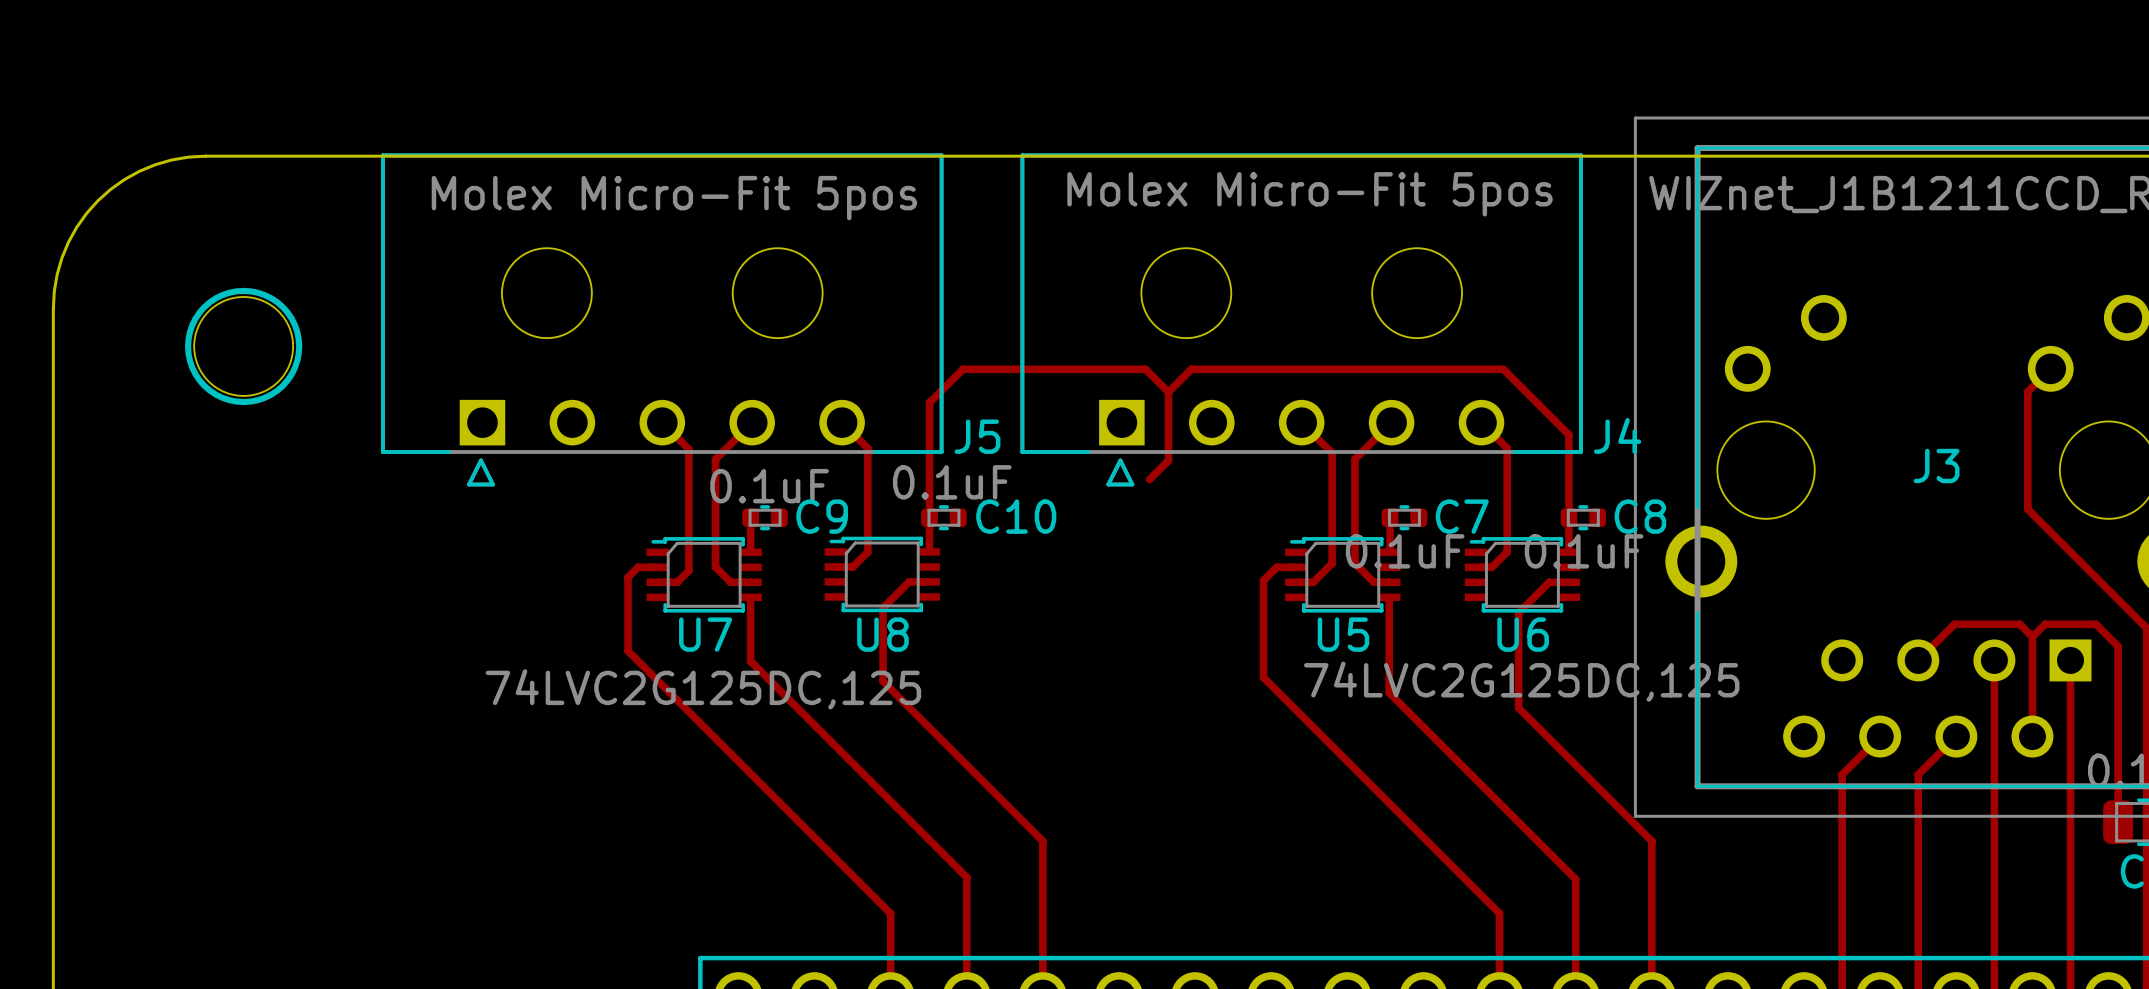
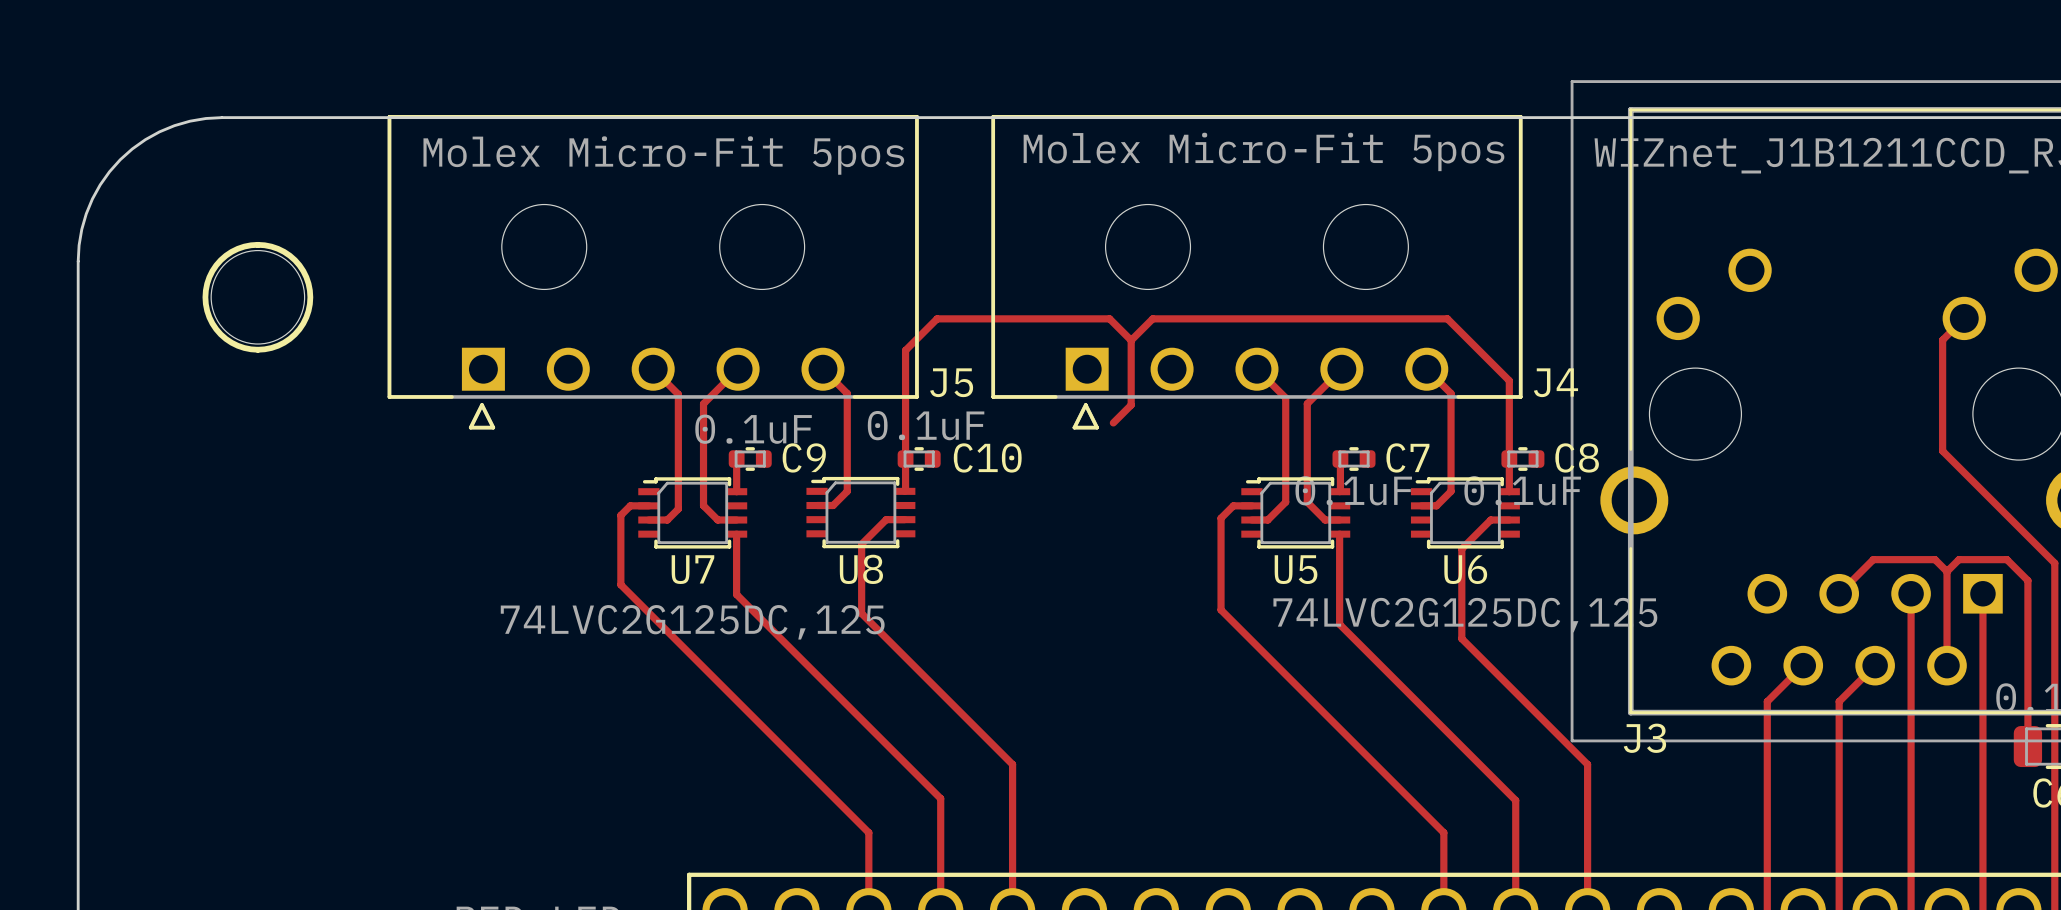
J3 name position: J3 (1936, 466) -> J3 (1644, 738)

